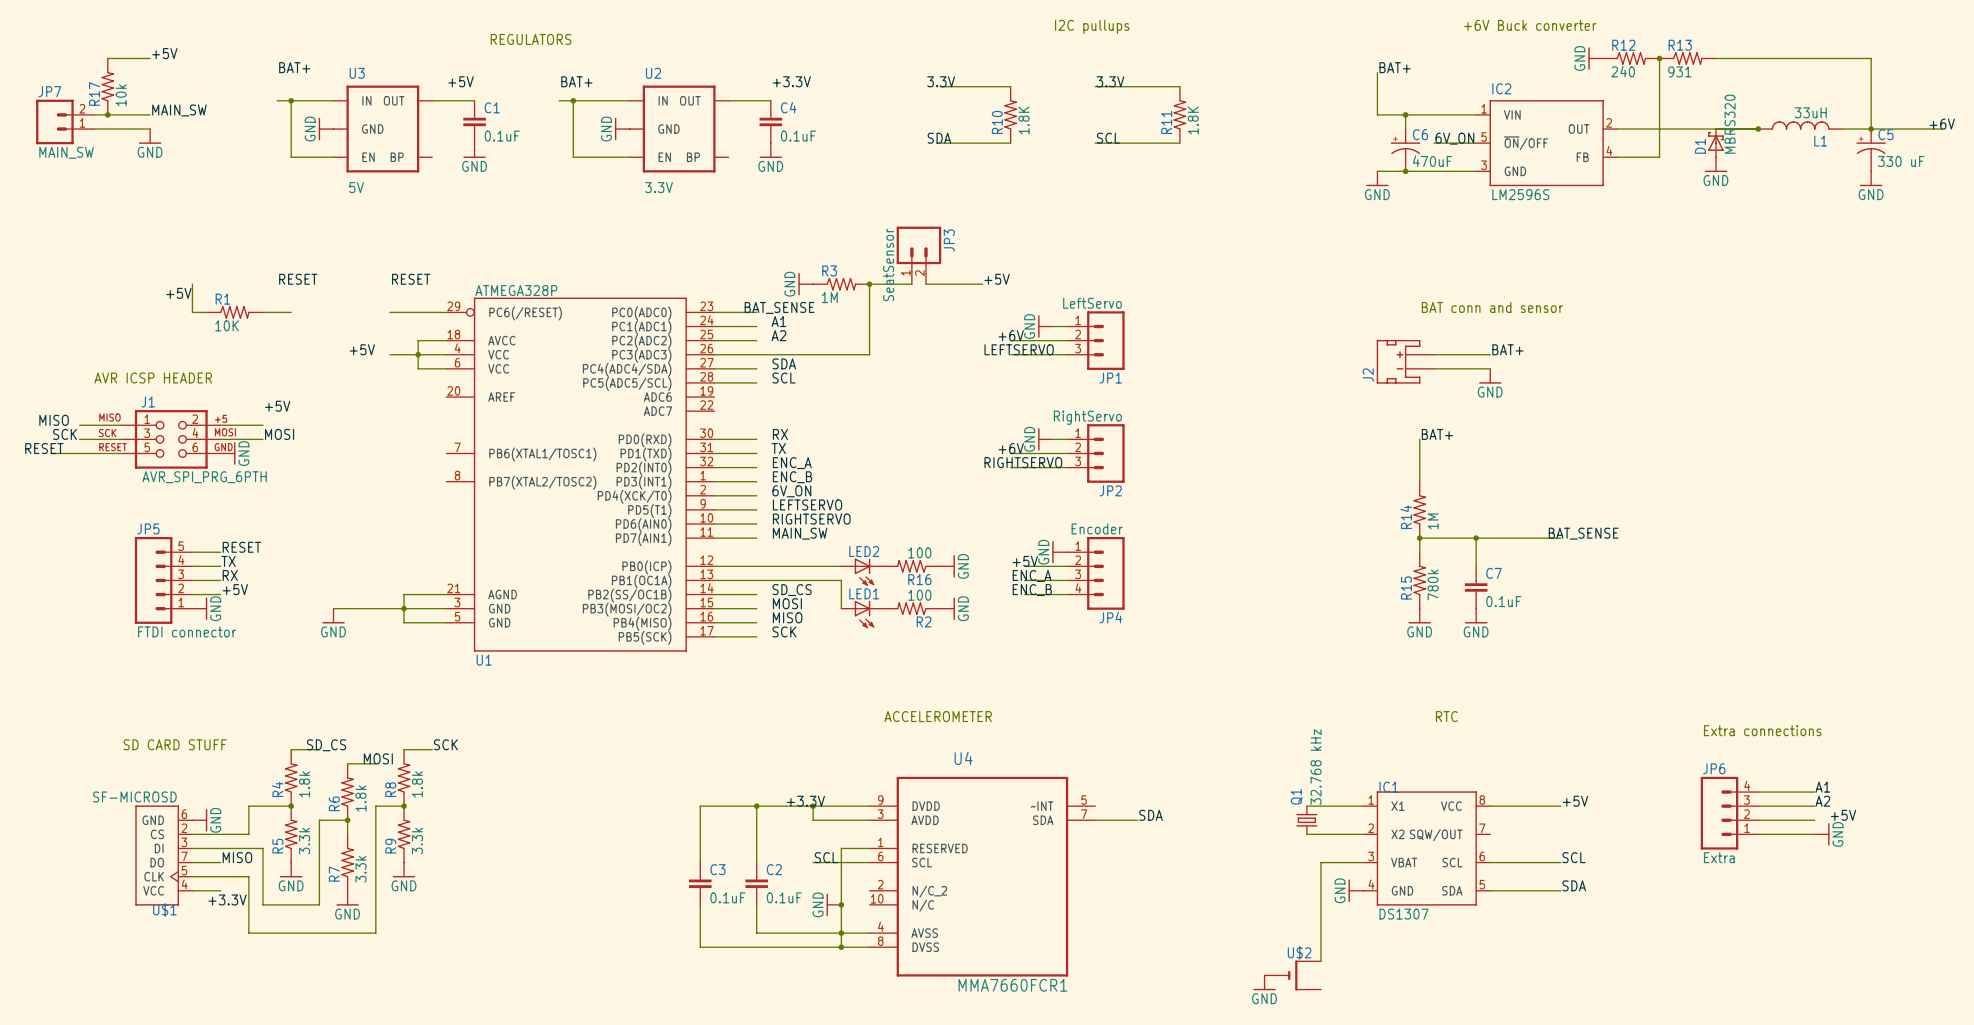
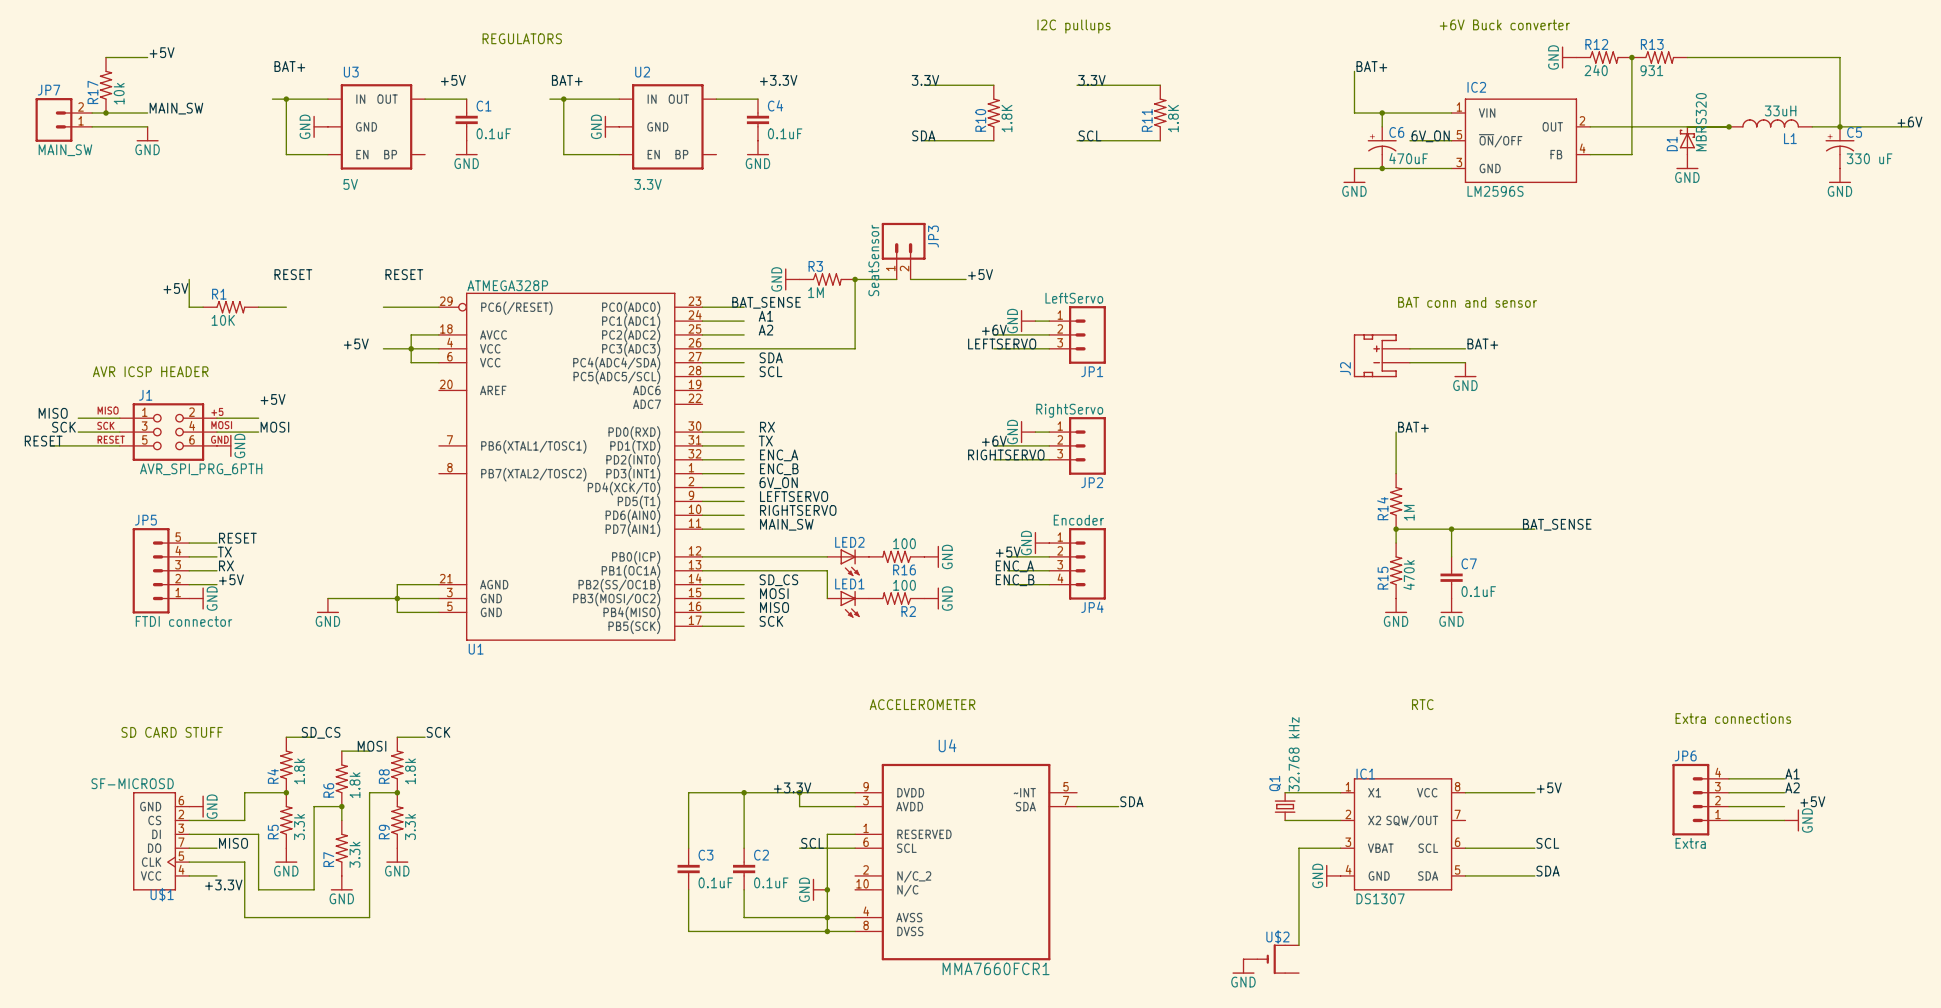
R15 value: 780k (1433, 585) -> 470k (1409, 575)

